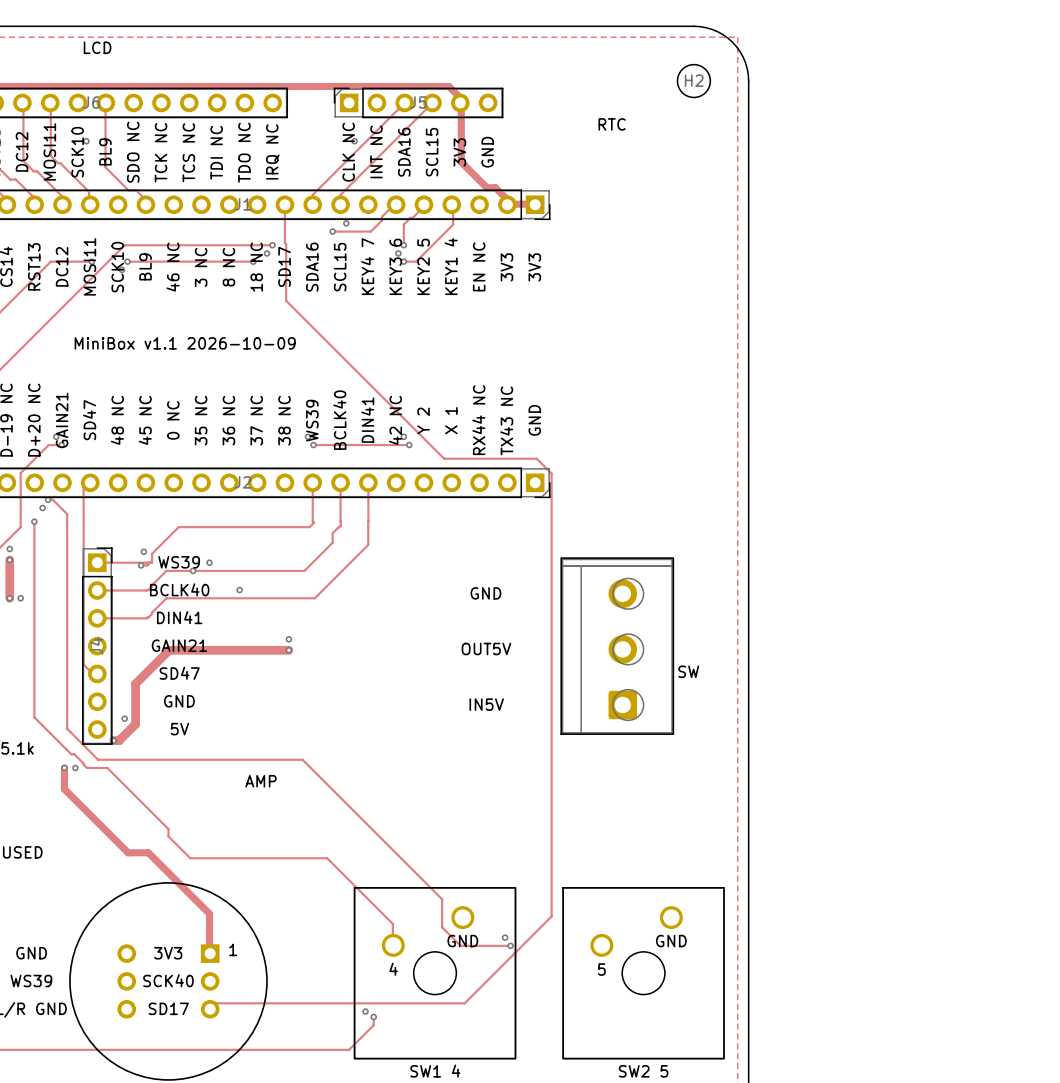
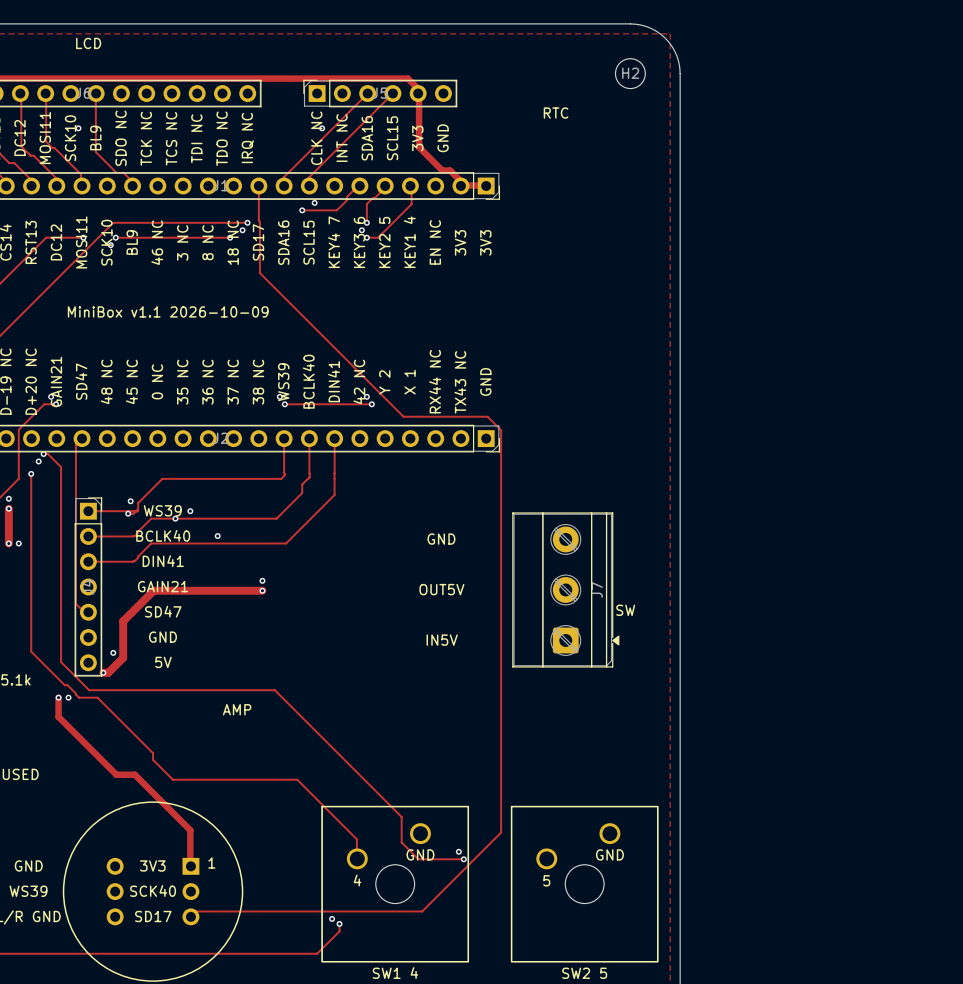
part: (617, 646) -> none
J7: none -> (565, 589)

